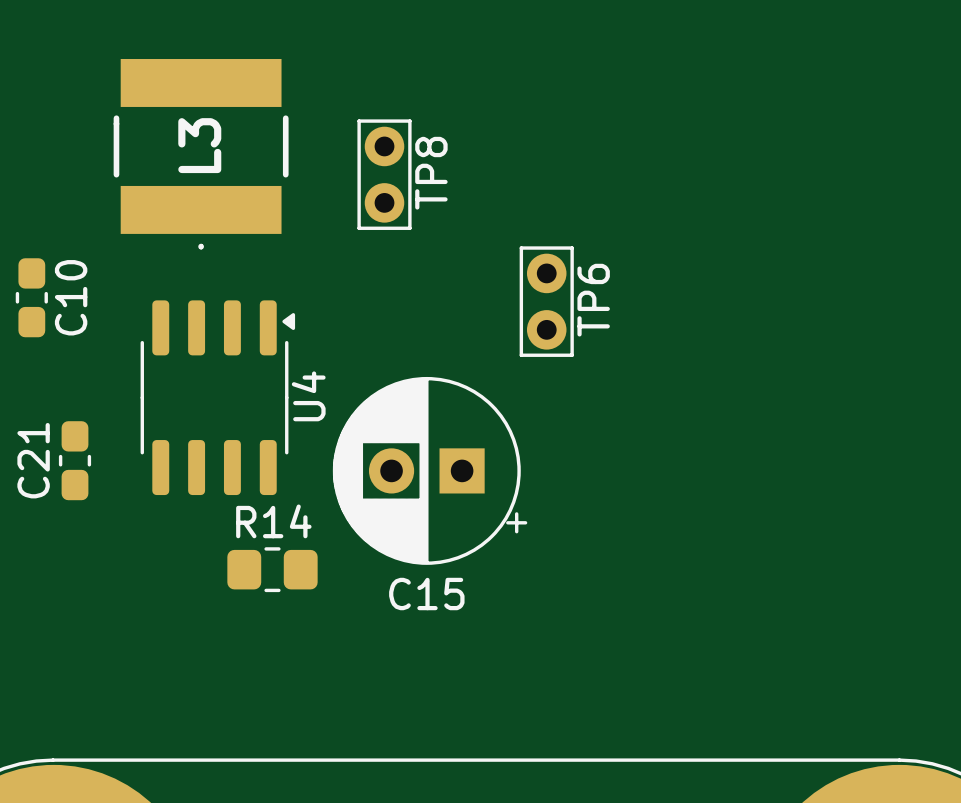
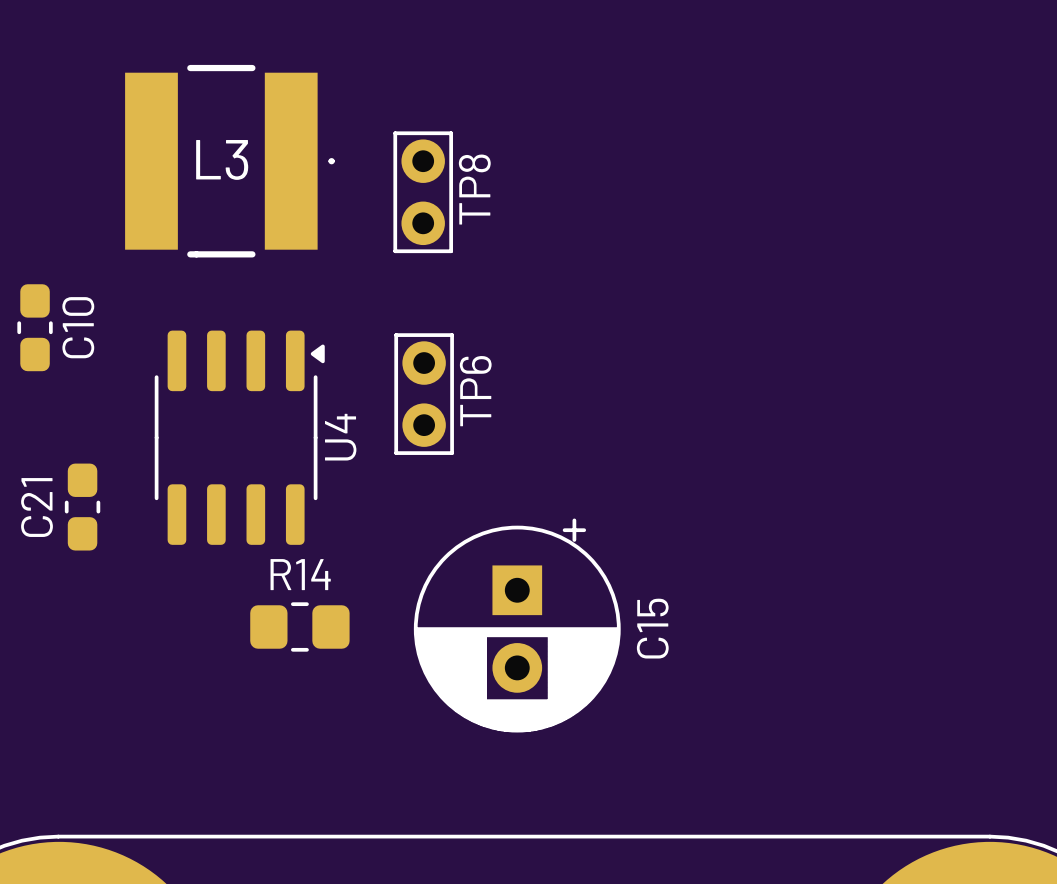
L3 rotation: 0° (201, 154) -> 90° counterclockwise (229, 161)
TP6 position: (546, 301) -> (424, 394)
C15 rotation: 0° (430, 470) -> 90° counterclockwise (517, 625)

